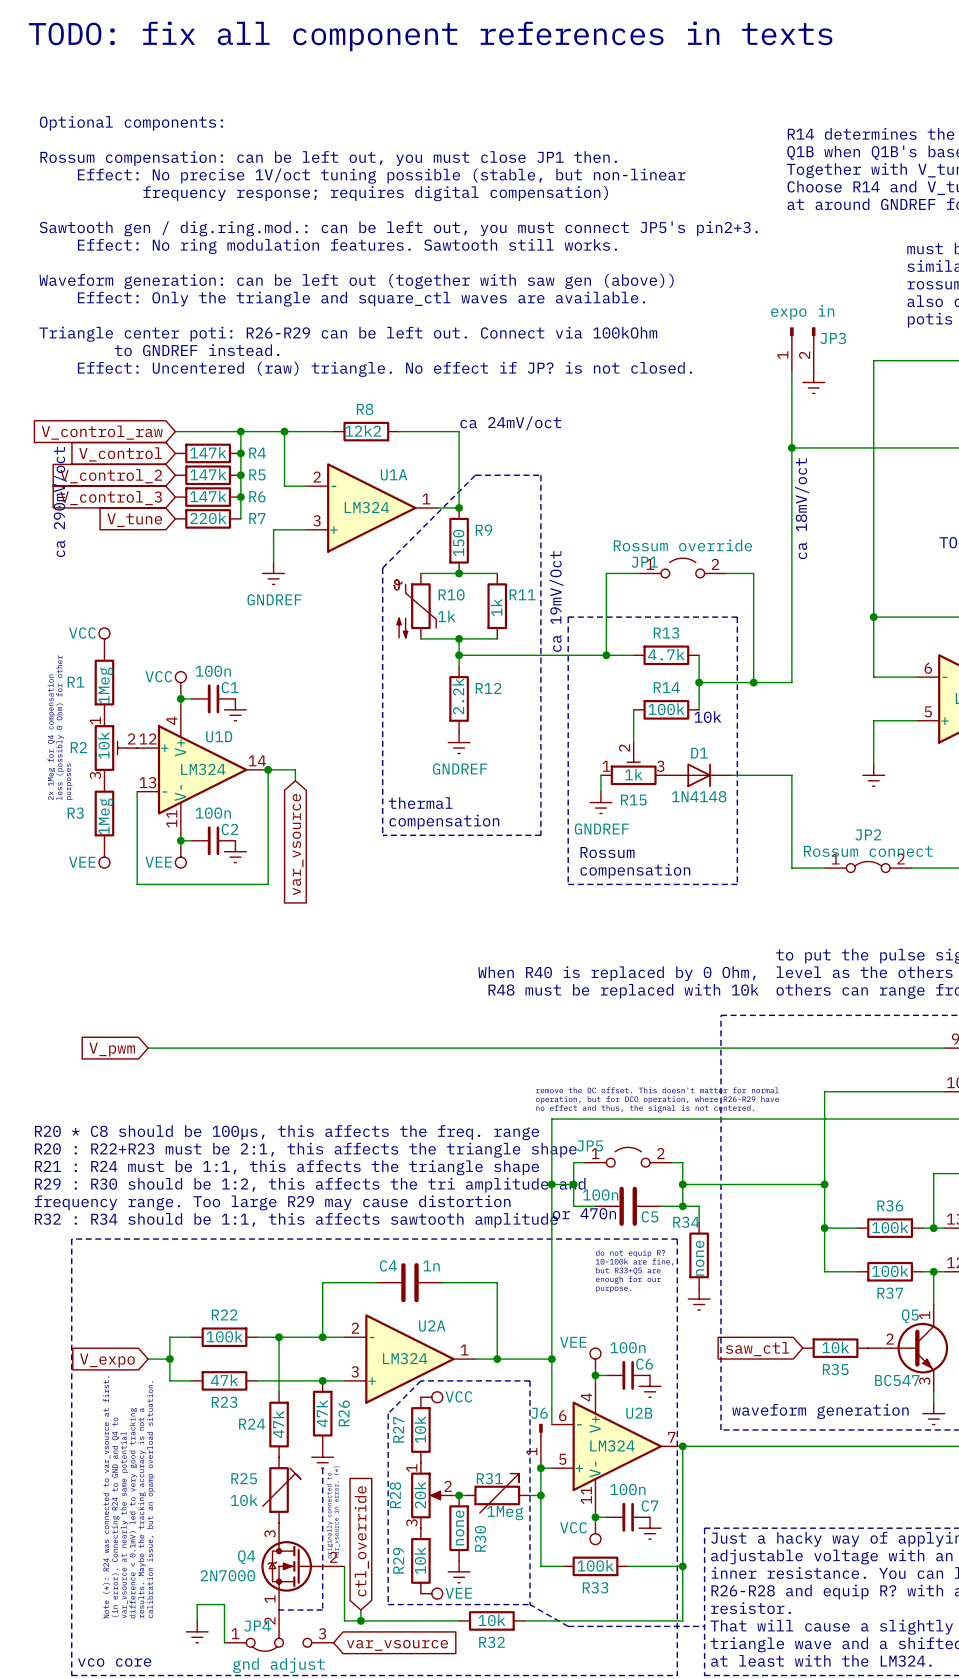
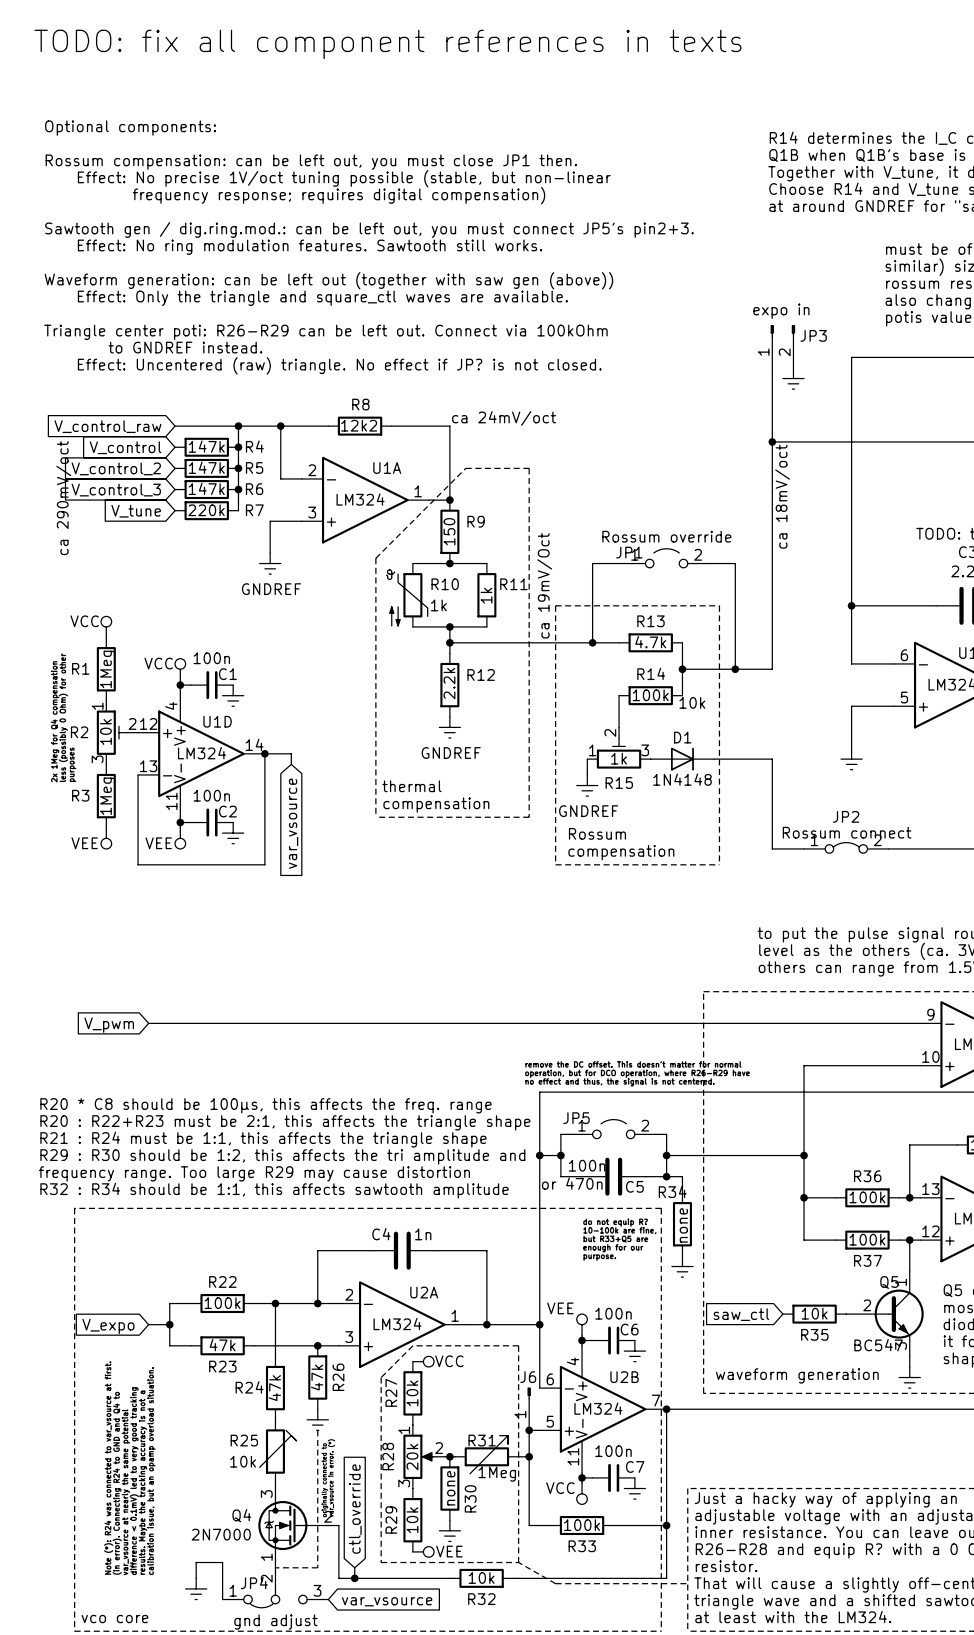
text: When R40 is replaced by 0 Ohm, (617, 973) -> none
text: R48 must be replaced with 10k (623, 991) -> none

